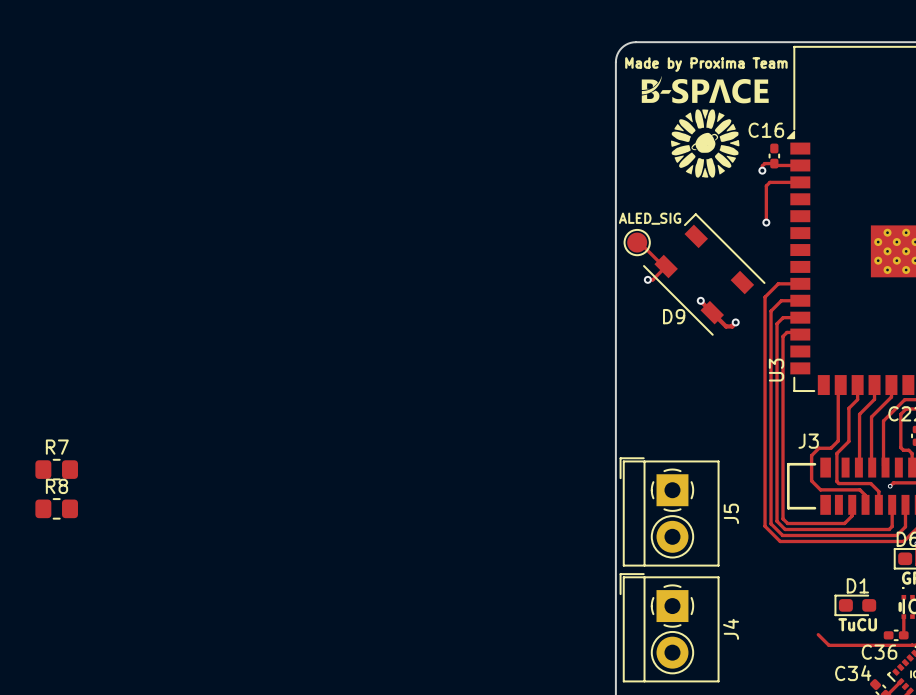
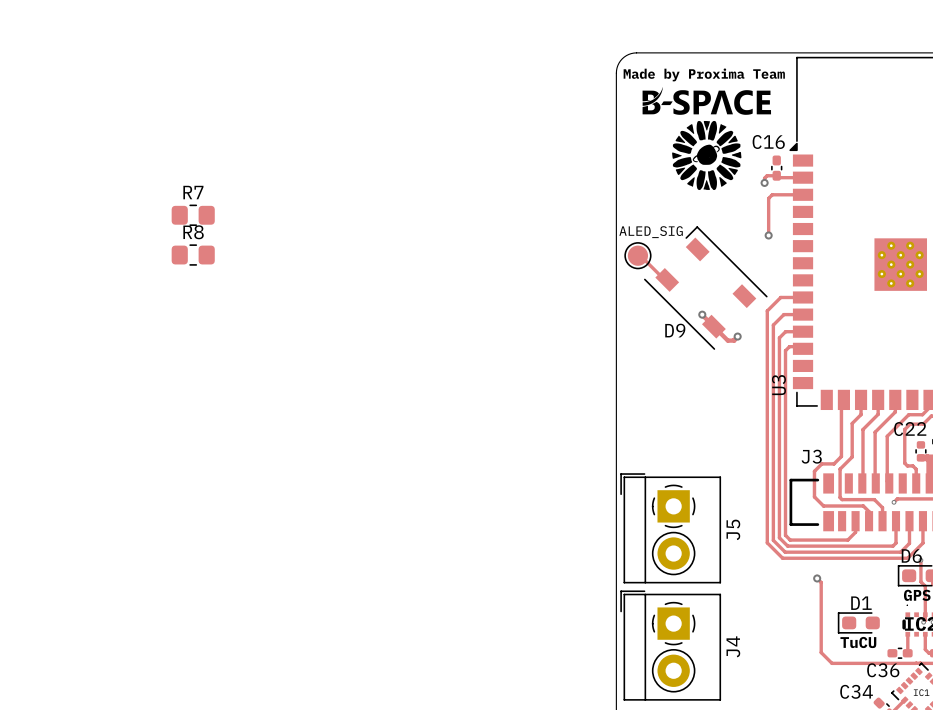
track: (666, 266) (652, 279) (647, 279) -> none
via: (647, 279) -> none
R7 position: (56, 469) -> (193, 215)
R8 position: (56, 508) -> (193, 255)
track: none -> (817, 576) (821, 582) (821, 652)
via: none -> (817, 578)

